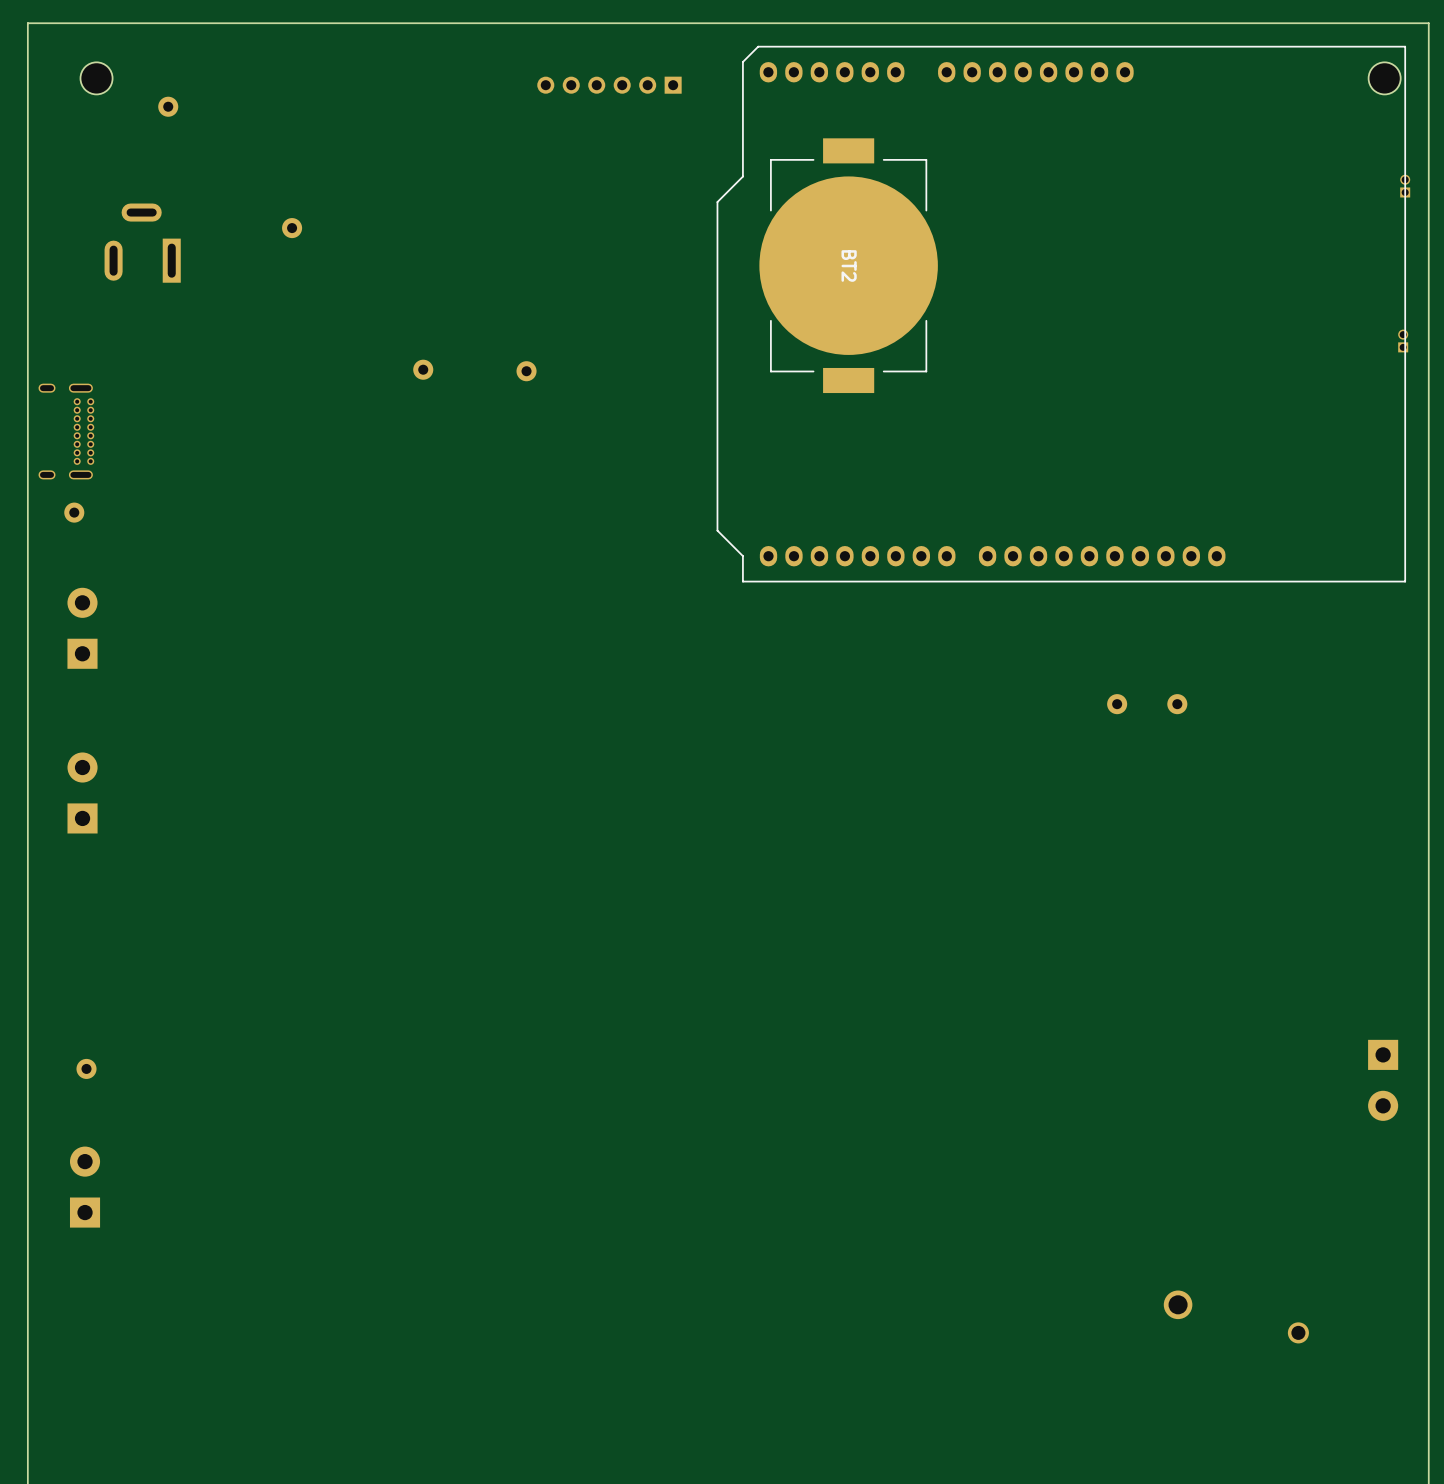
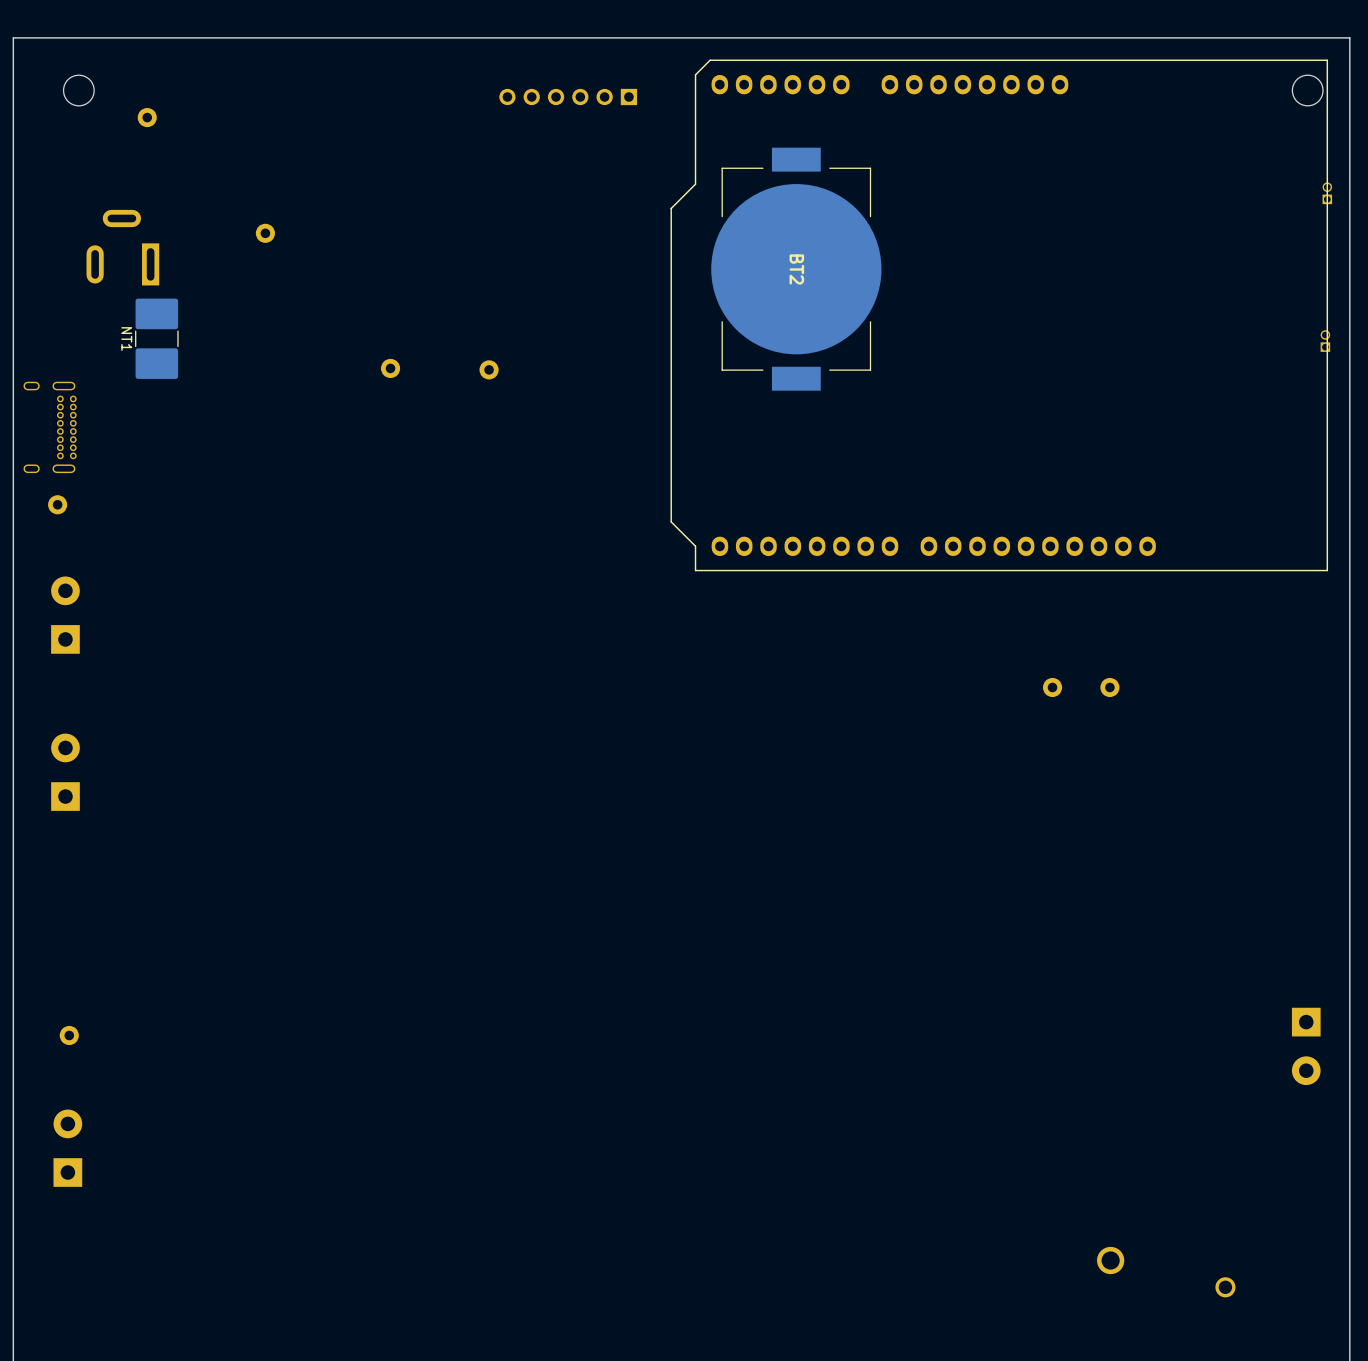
NT1: none -> (156, 338)

